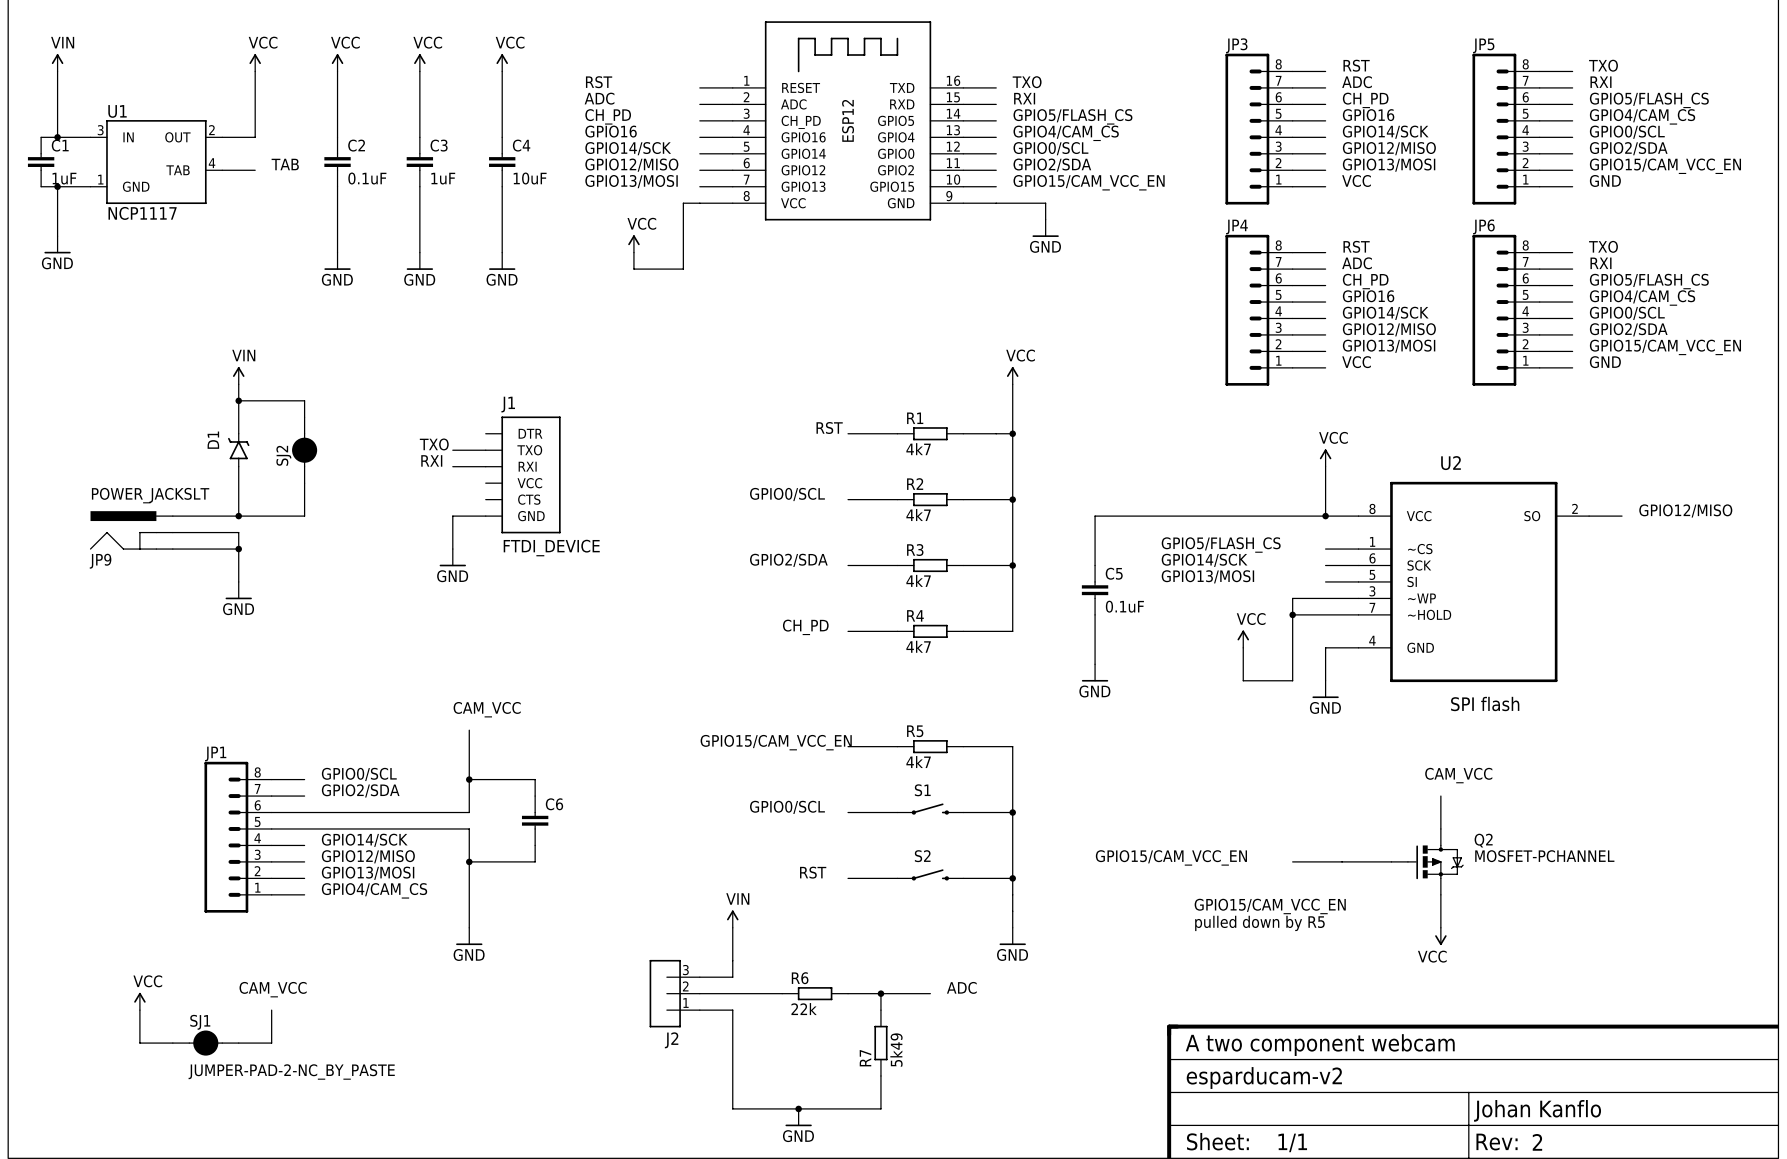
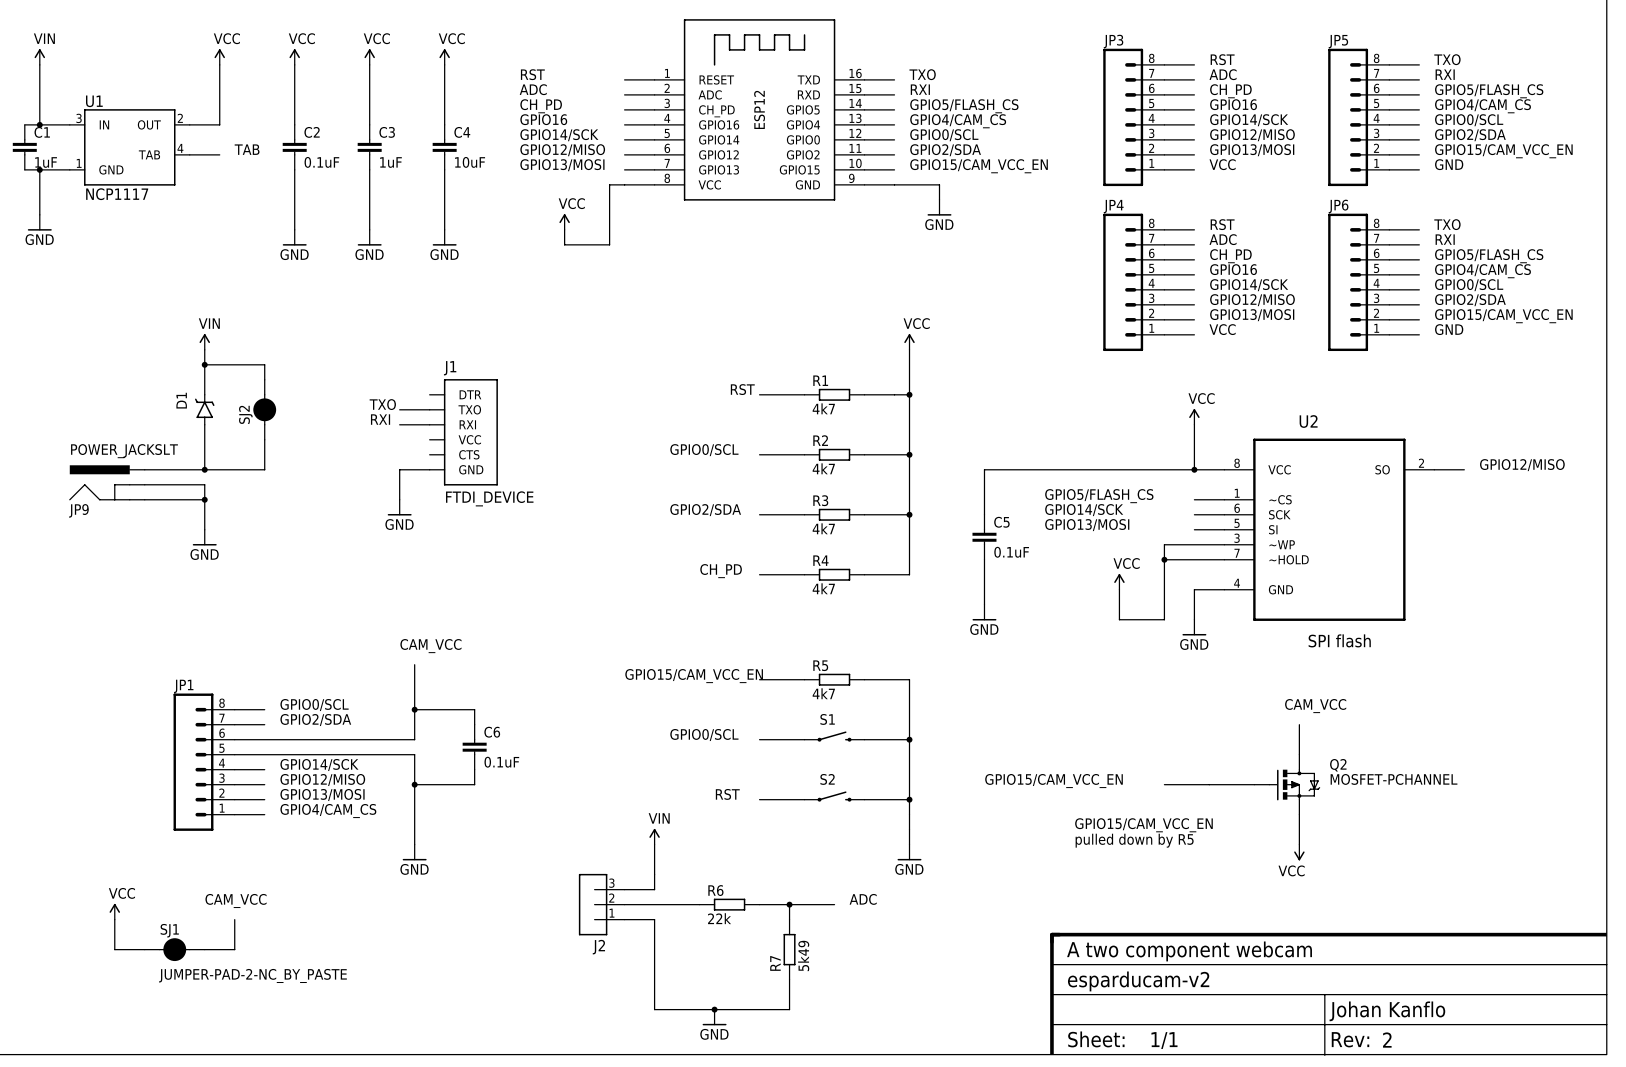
C6 value: none -> 0.1uF (501, 762)

